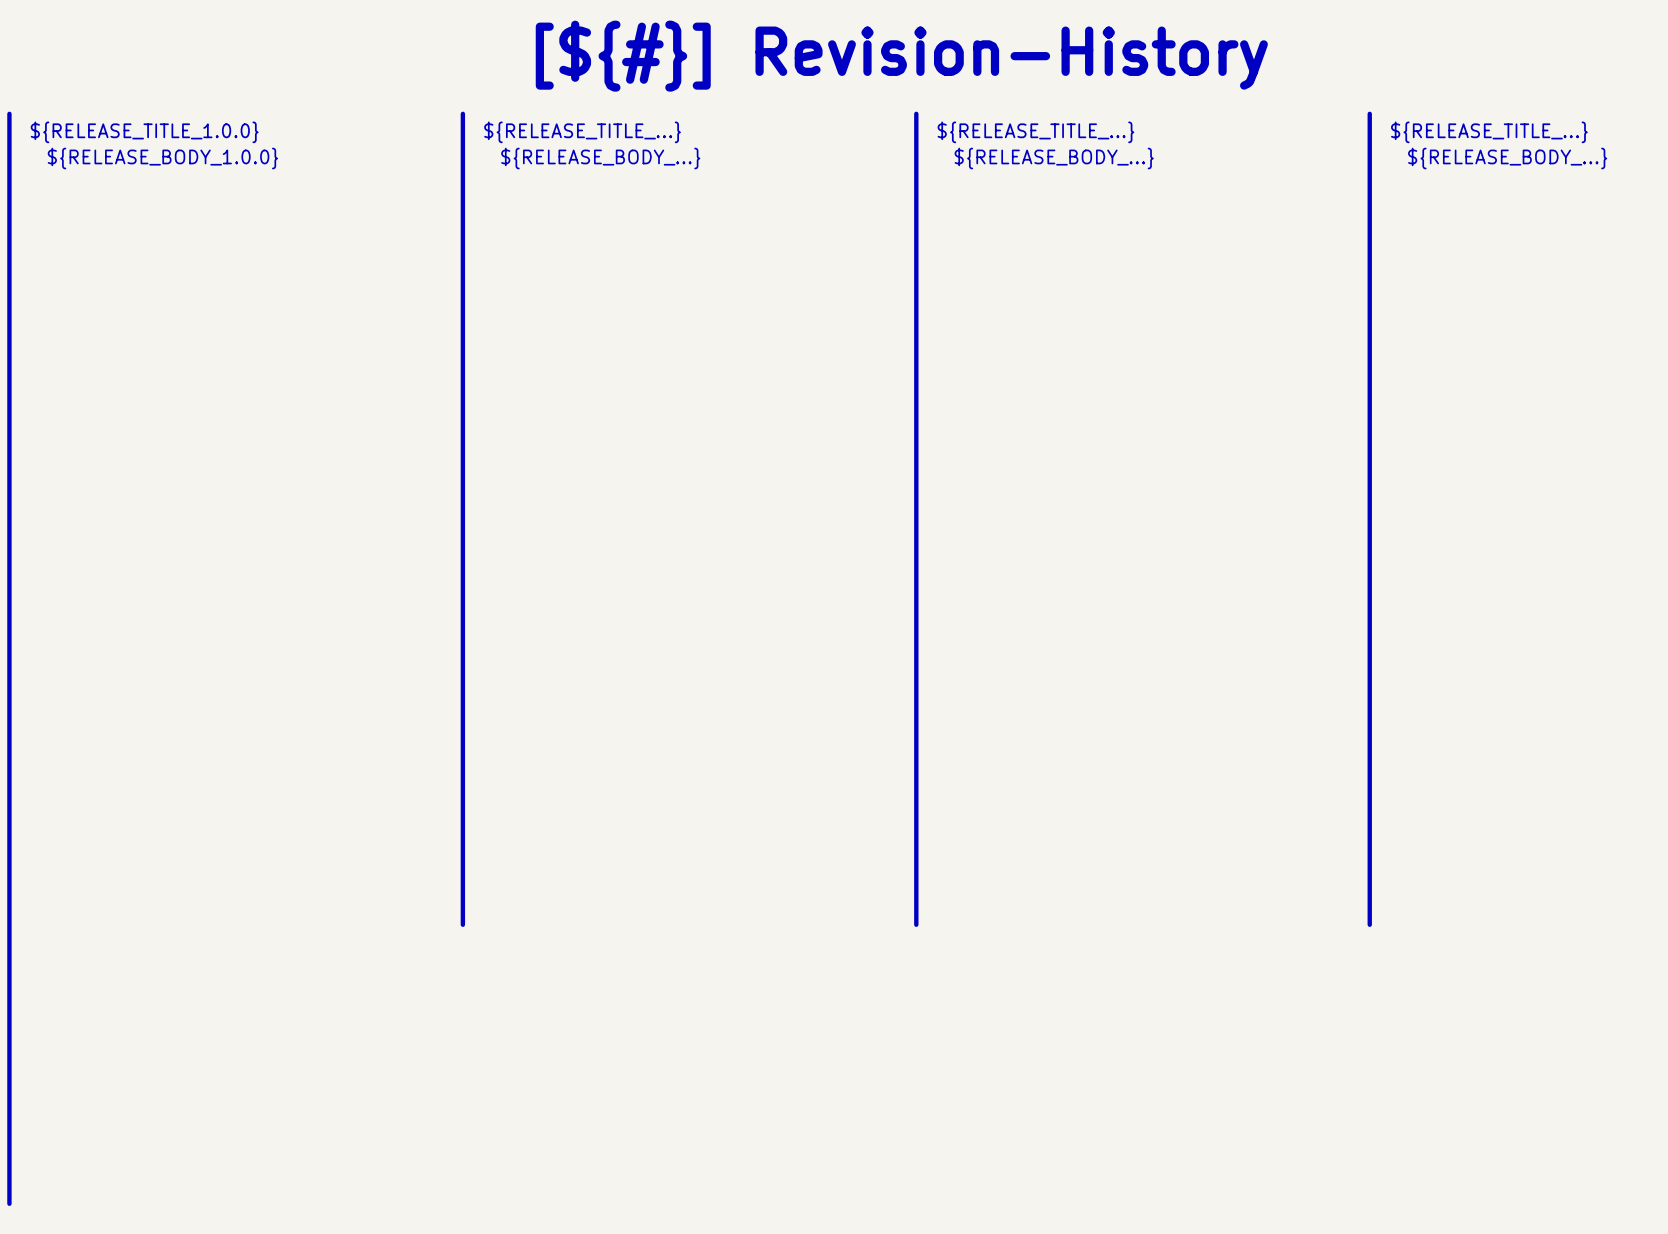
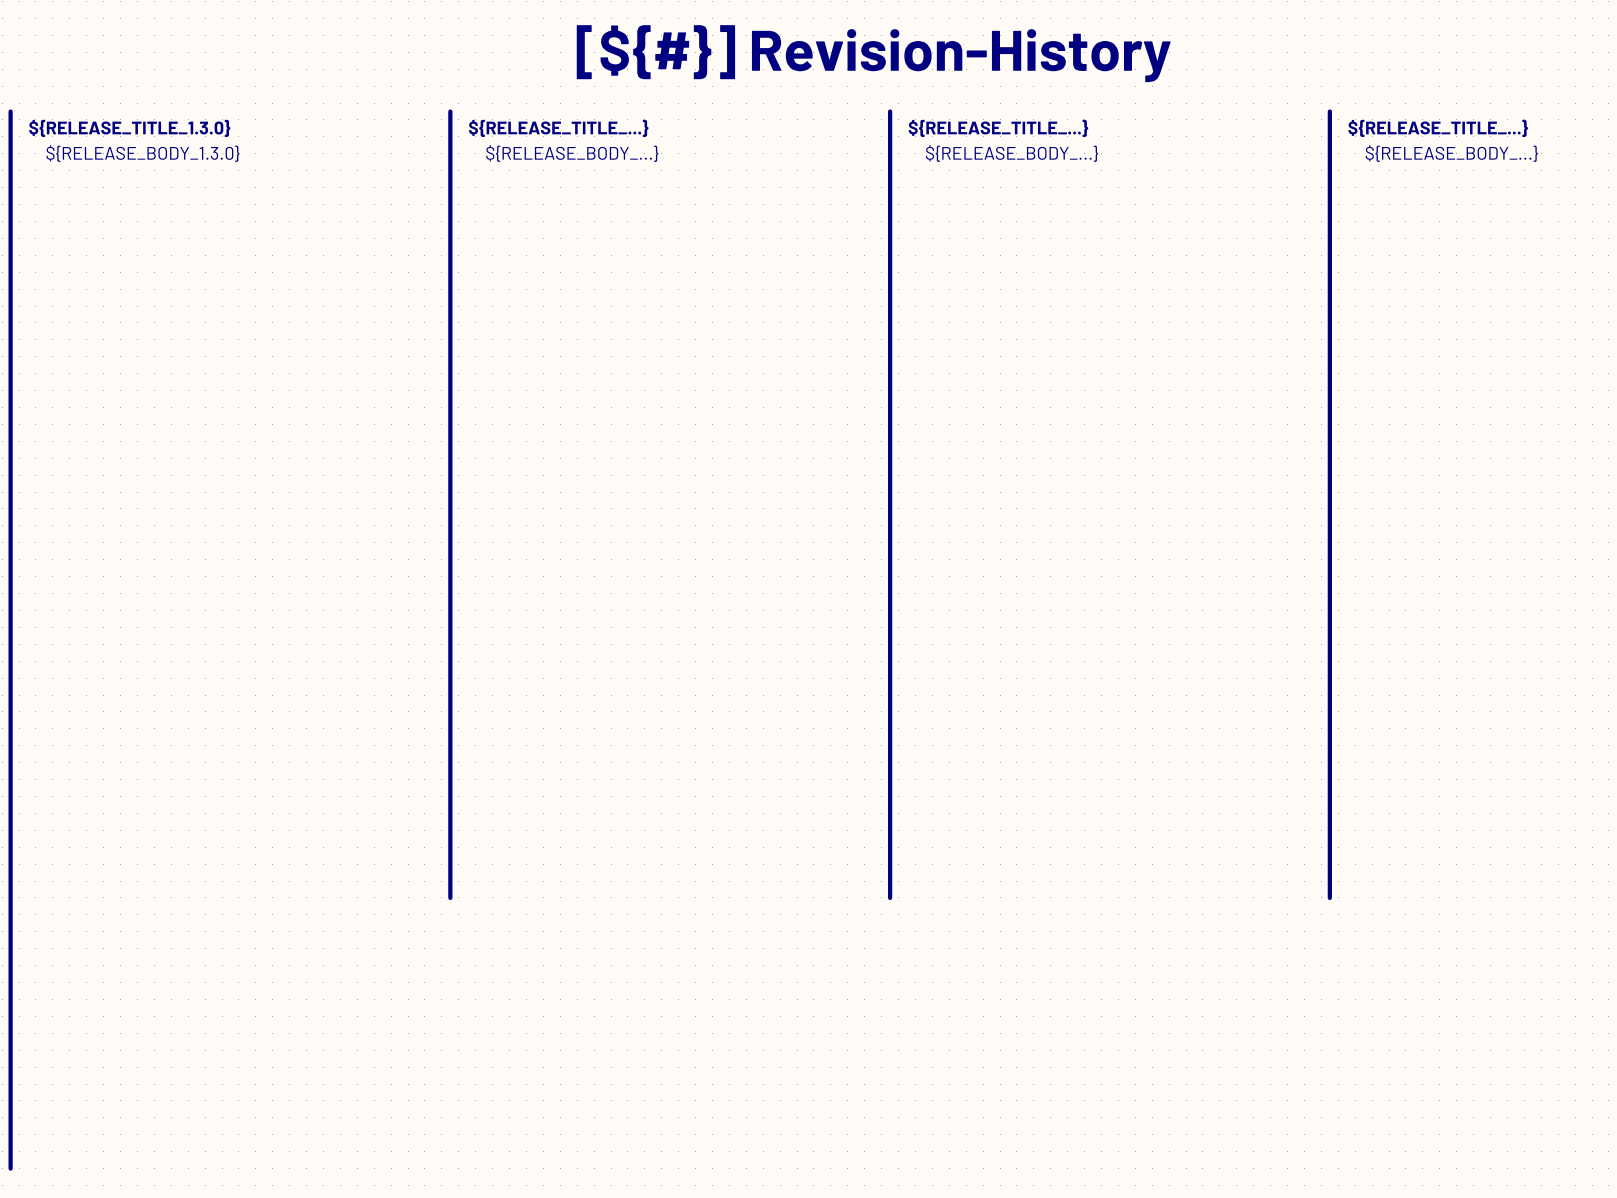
text: ${RELEASE_TITLE_1.0.0} (144, 132) -> ${RELEASE_TITLE_1.3.0} (129, 128)
text: ${RELEASE_BODY_1.0.0} (162, 158) -> ${RELEASE_BODY_1.3.0} (142, 153)

